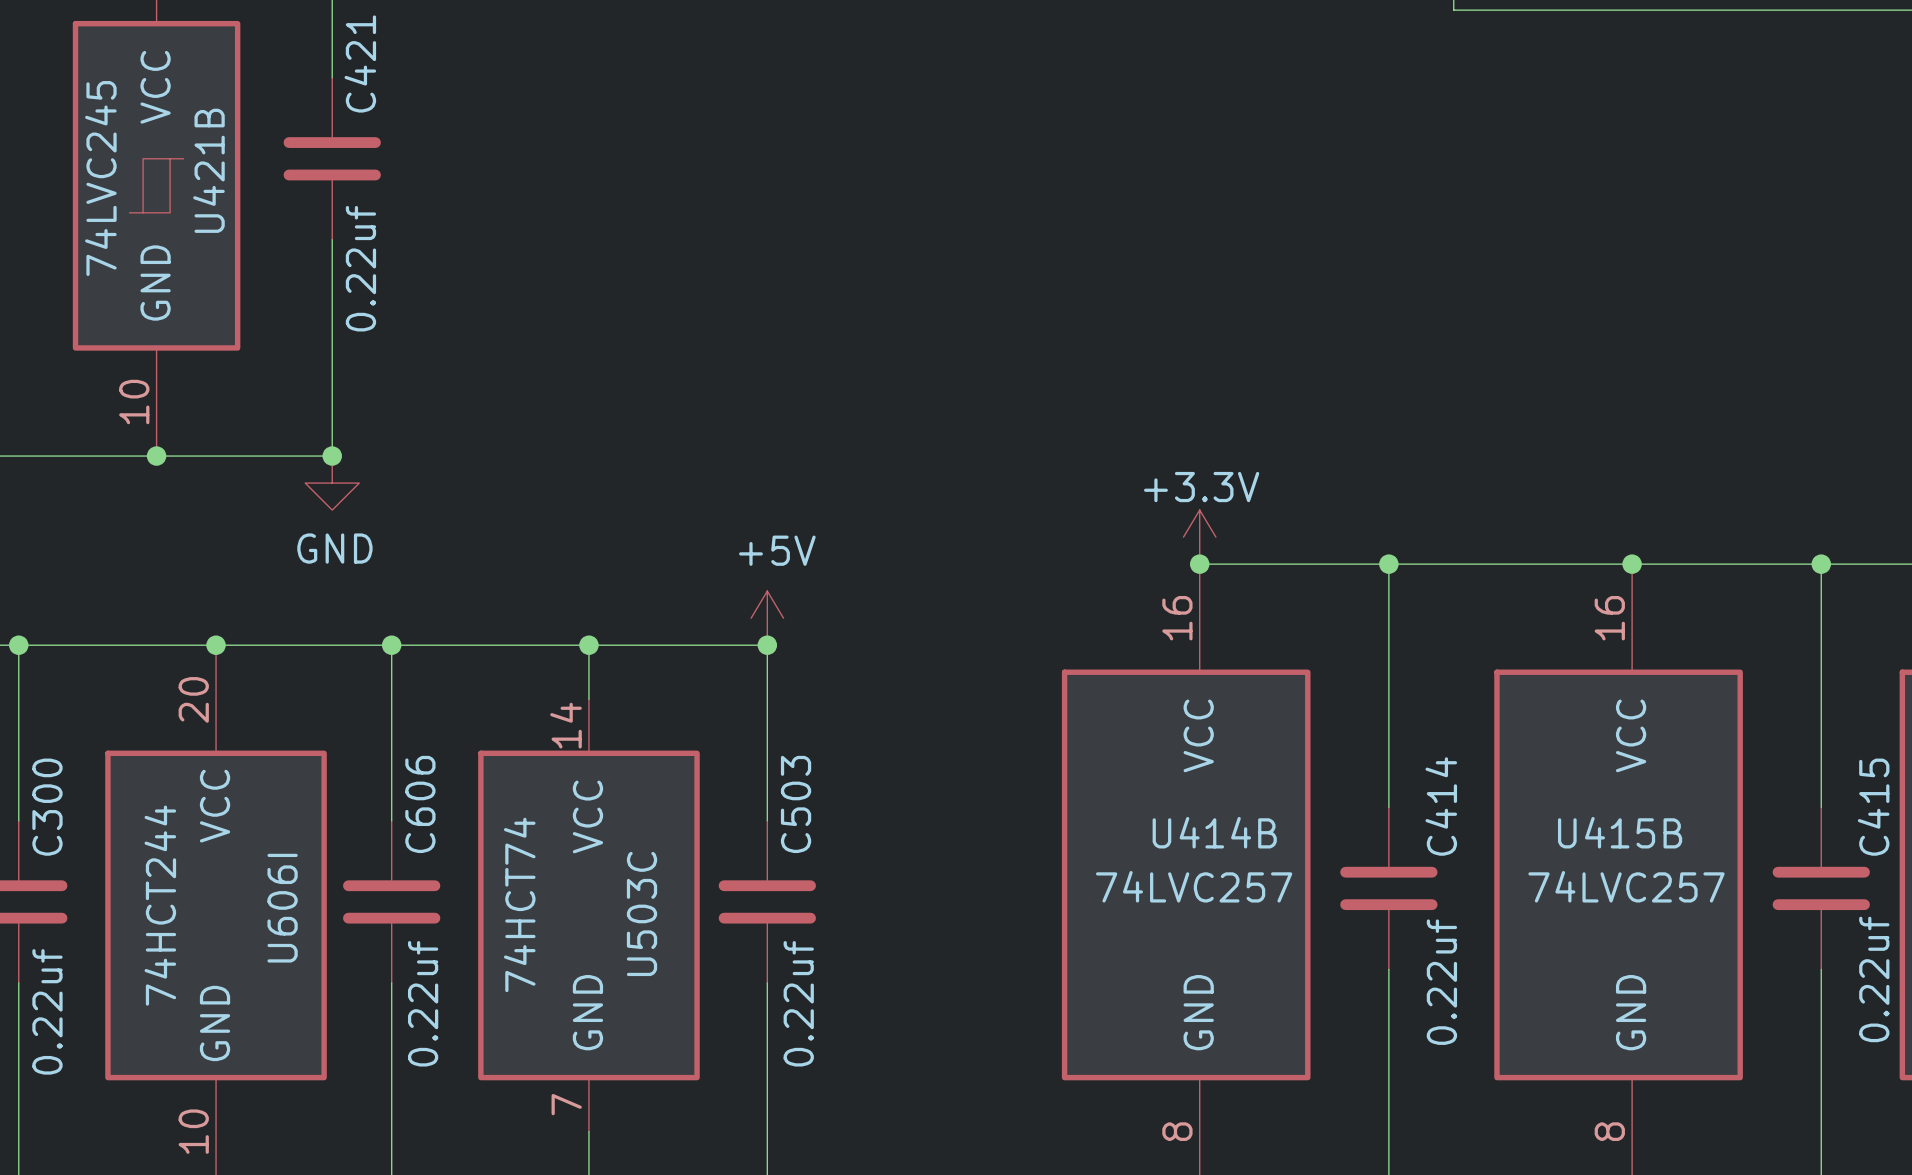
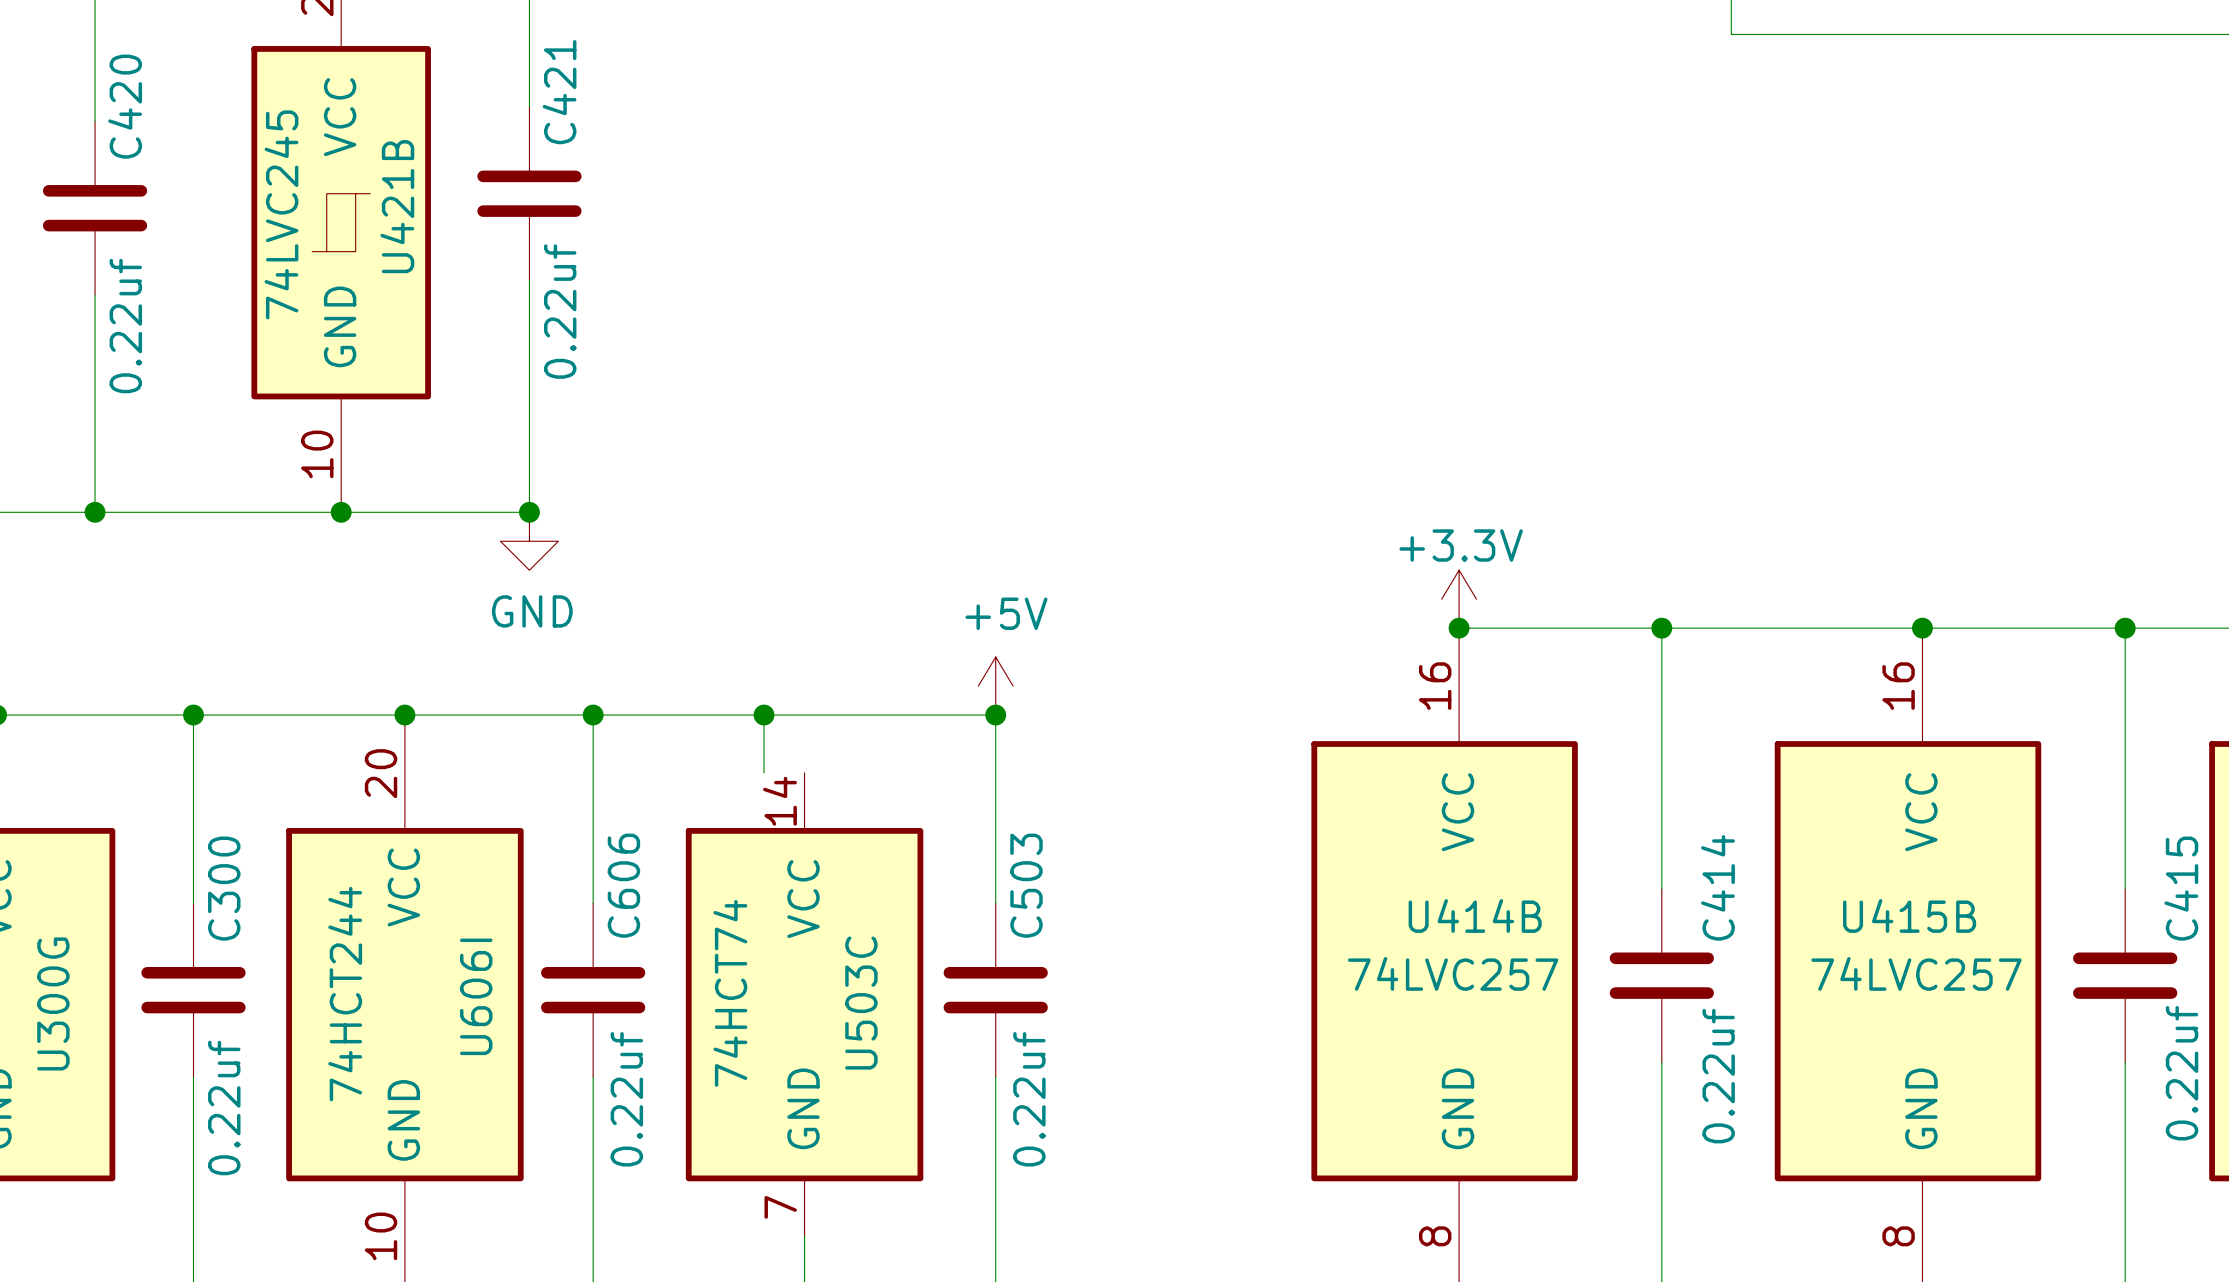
wire: (588, 645) (588, 699) -> (764, 715) (764, 772)
junction position: (588, 645) -> (764, 715)

